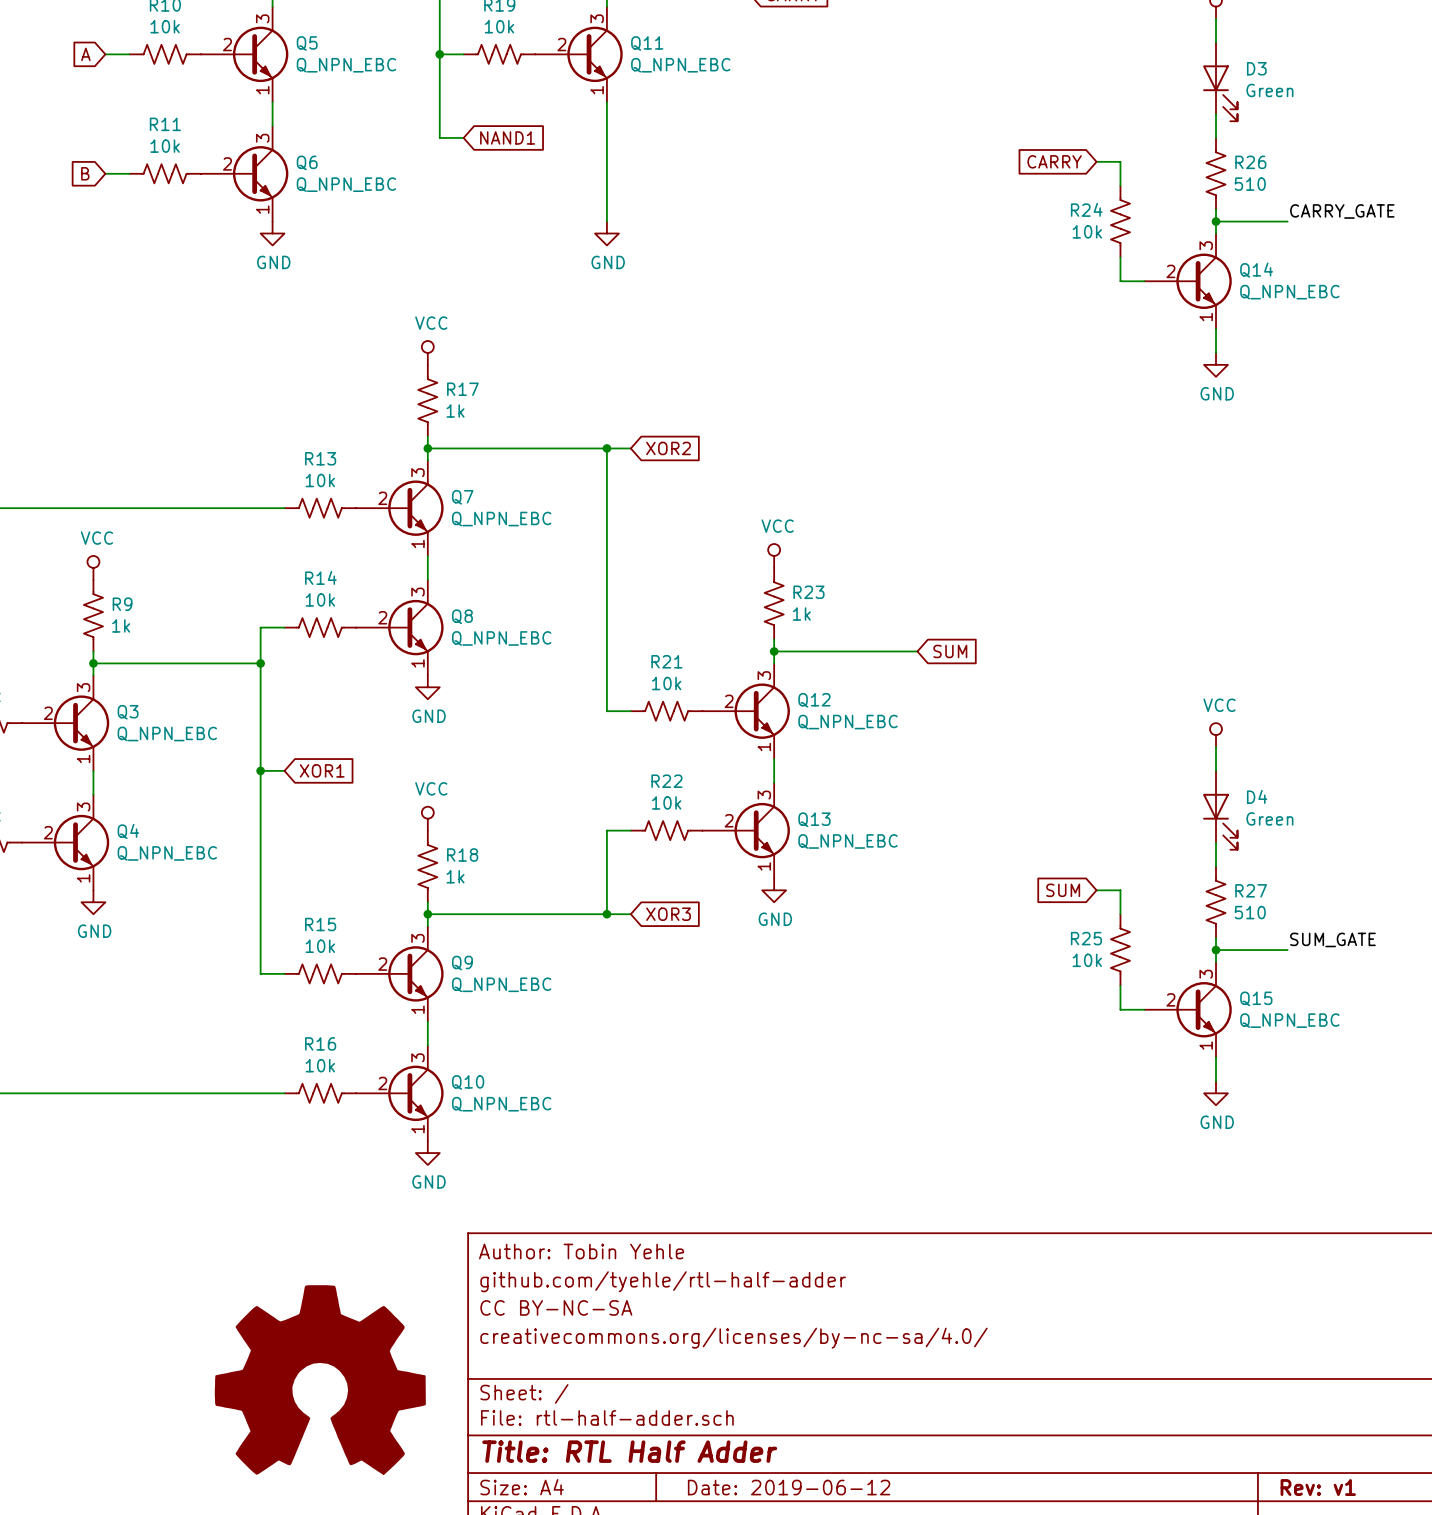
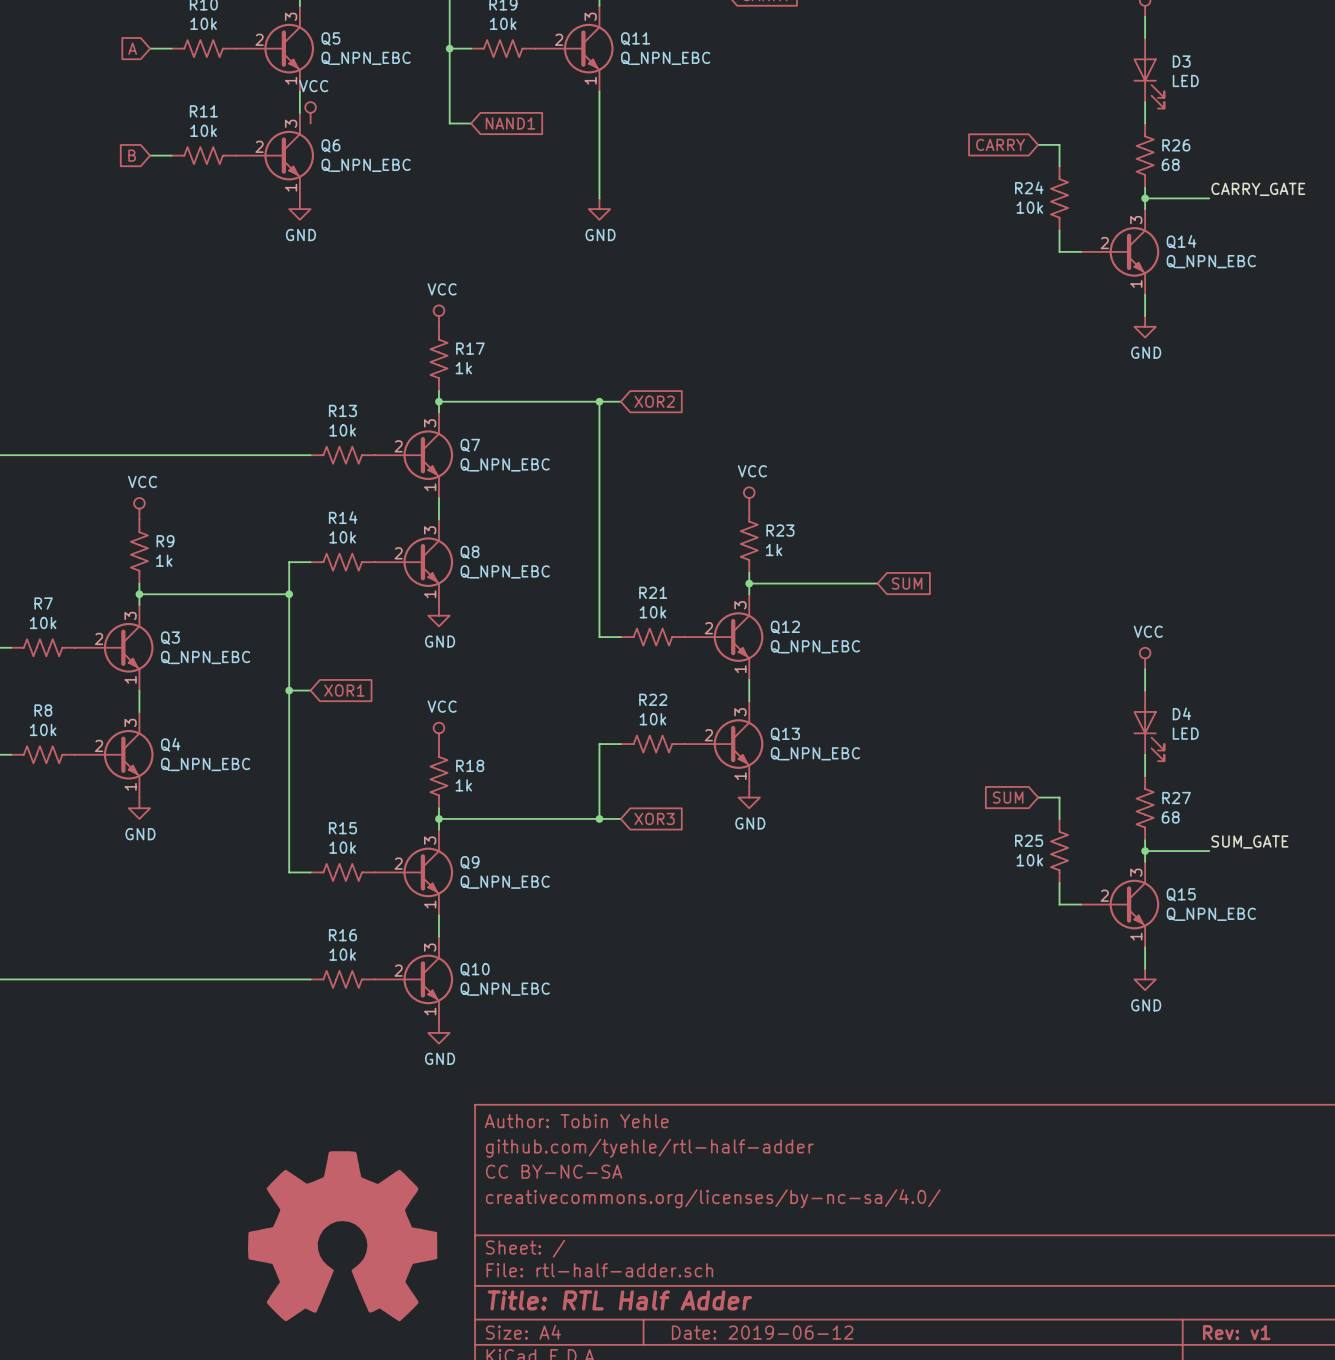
D3 value: Green (1269, 90) -> LED (1185, 80)
power symbol: none -> VCC (310, 112)
R26 value: 510 (1250, 184) -> 68 (1170, 164)
D4 value: Green (1269, 818) -> LED (1185, 733)
R27 value: 510 (1250, 912) -> 68 (1170, 817)

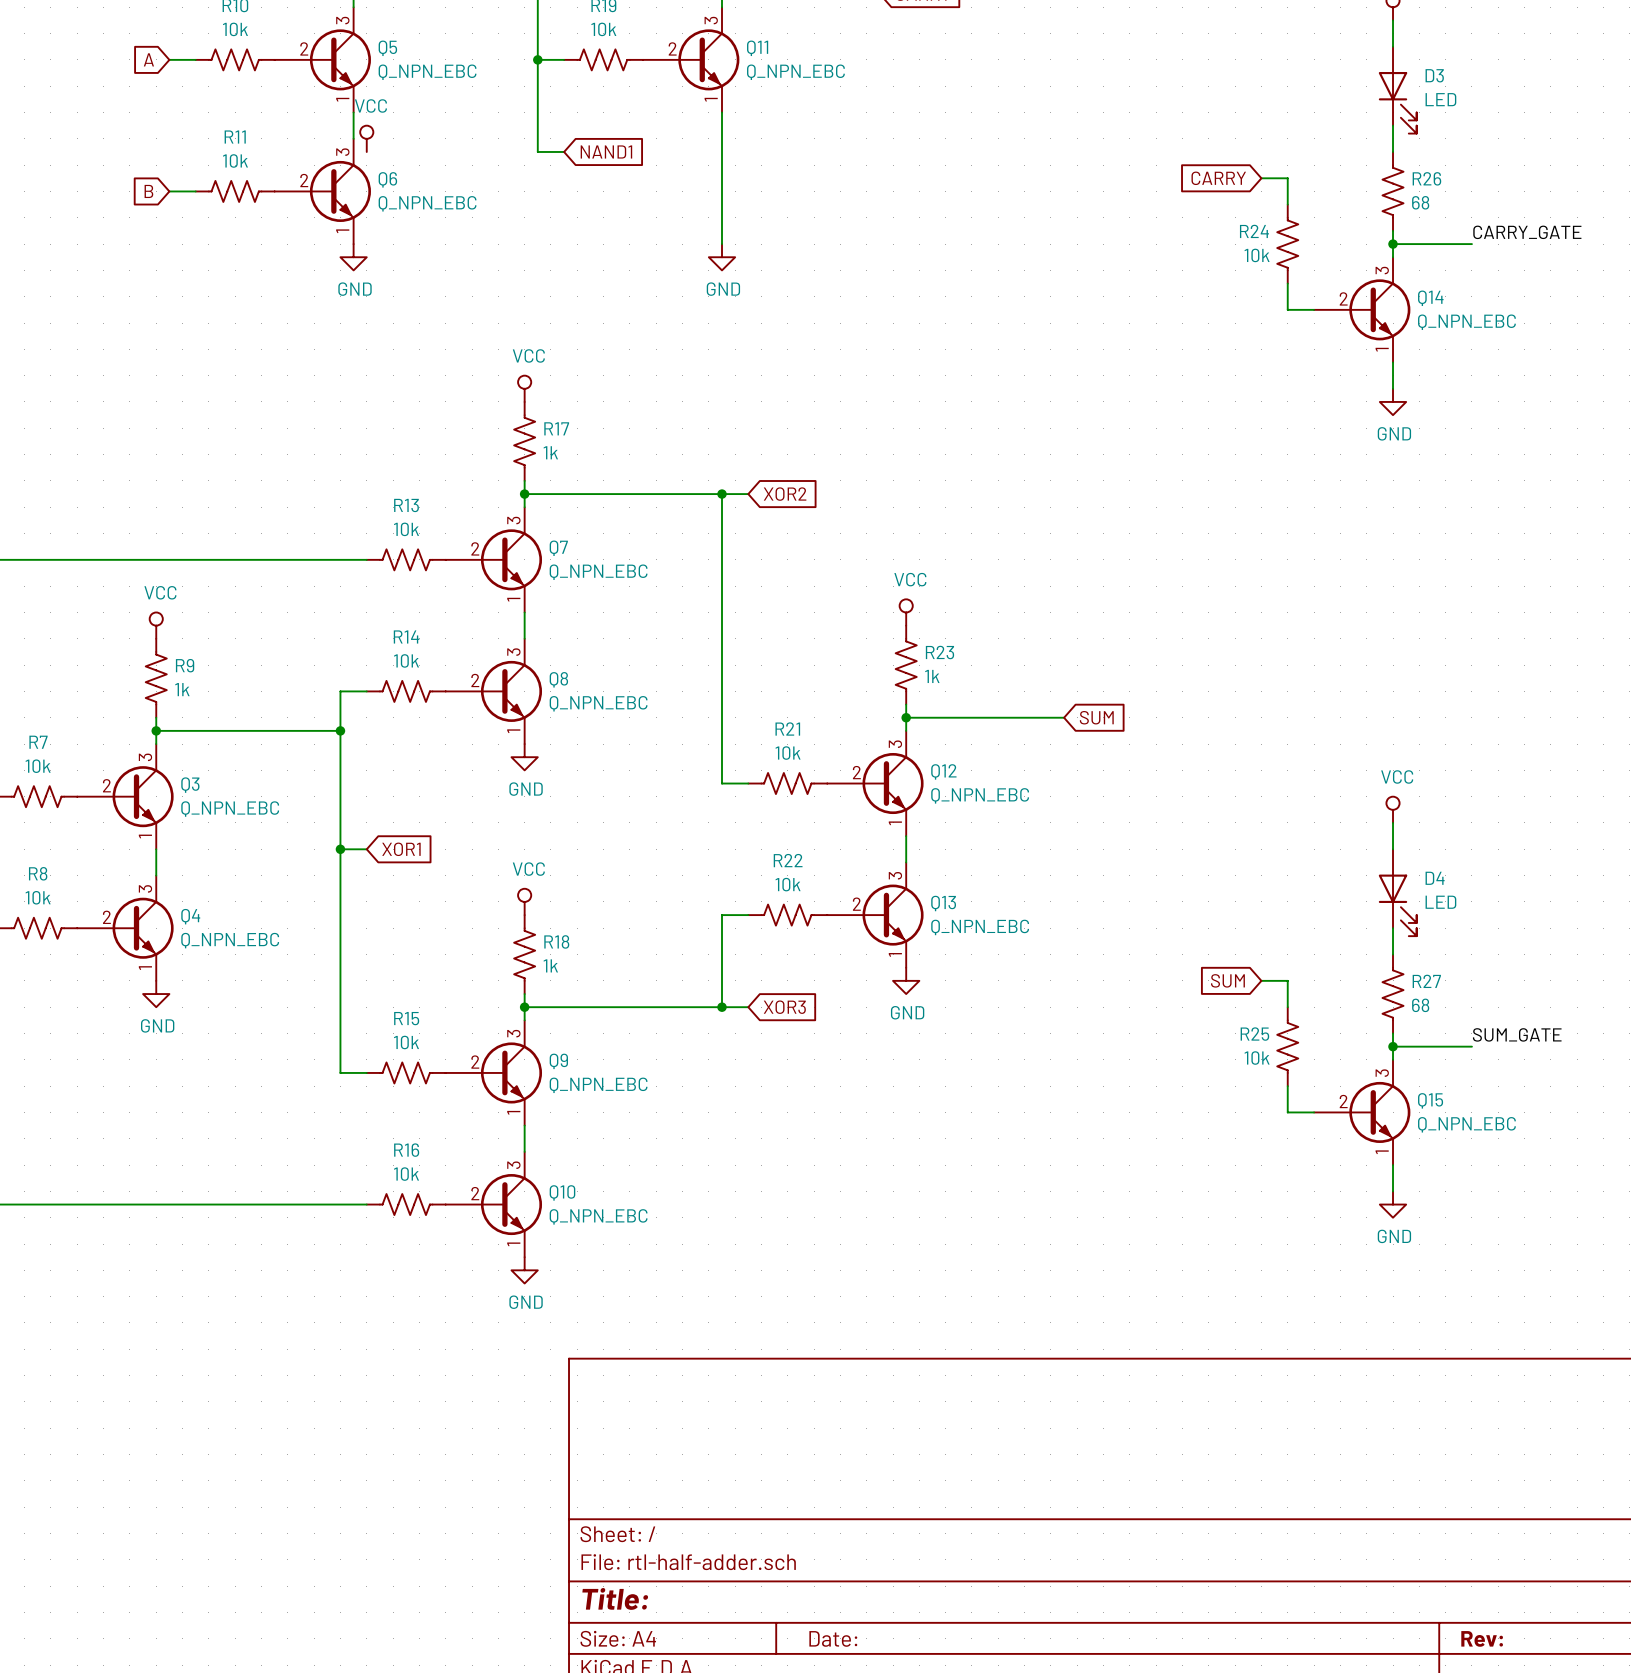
title block: Author: Tobin Yehle (576, 1121) -> none
title block: github.com/tyehle/rtl-half-adder (649, 1148) -> none
title block: CC BY-NC-SA (554, 1171) -> none
title block: creativecommons.org/licenses/by-nc-sa/4.0/ (713, 1198) -> none
power symbol: (342, 1236) -> none
title block: Title: RTL Half Adder (619, 1300) -> Title: (615, 1598)
title block: Date: 2019-06-12 (762, 1332) -> Date: (833, 1638)
title block: Rev: v1 (1236, 1332) -> Rev: (1482, 1638)

